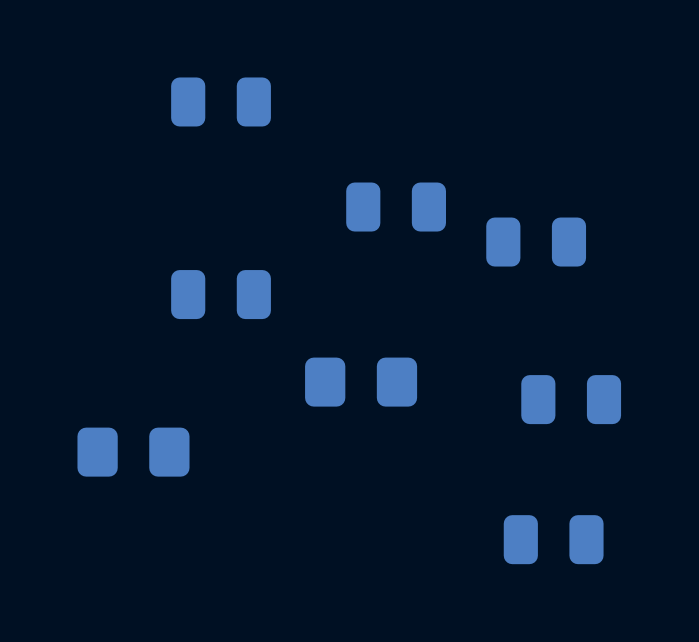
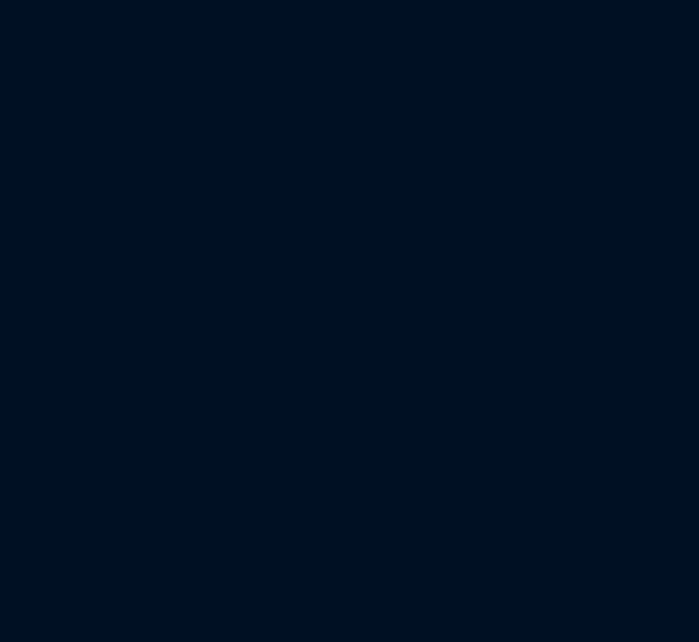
part: (221, 101) -> none
part: (396, 207) -> none
part: (536, 242) -> none
part: (221, 294) -> none
part: (361, 382) -> none
part: (571, 399) -> none
part: (133, 452) -> none
part: (553, 539) -> none

